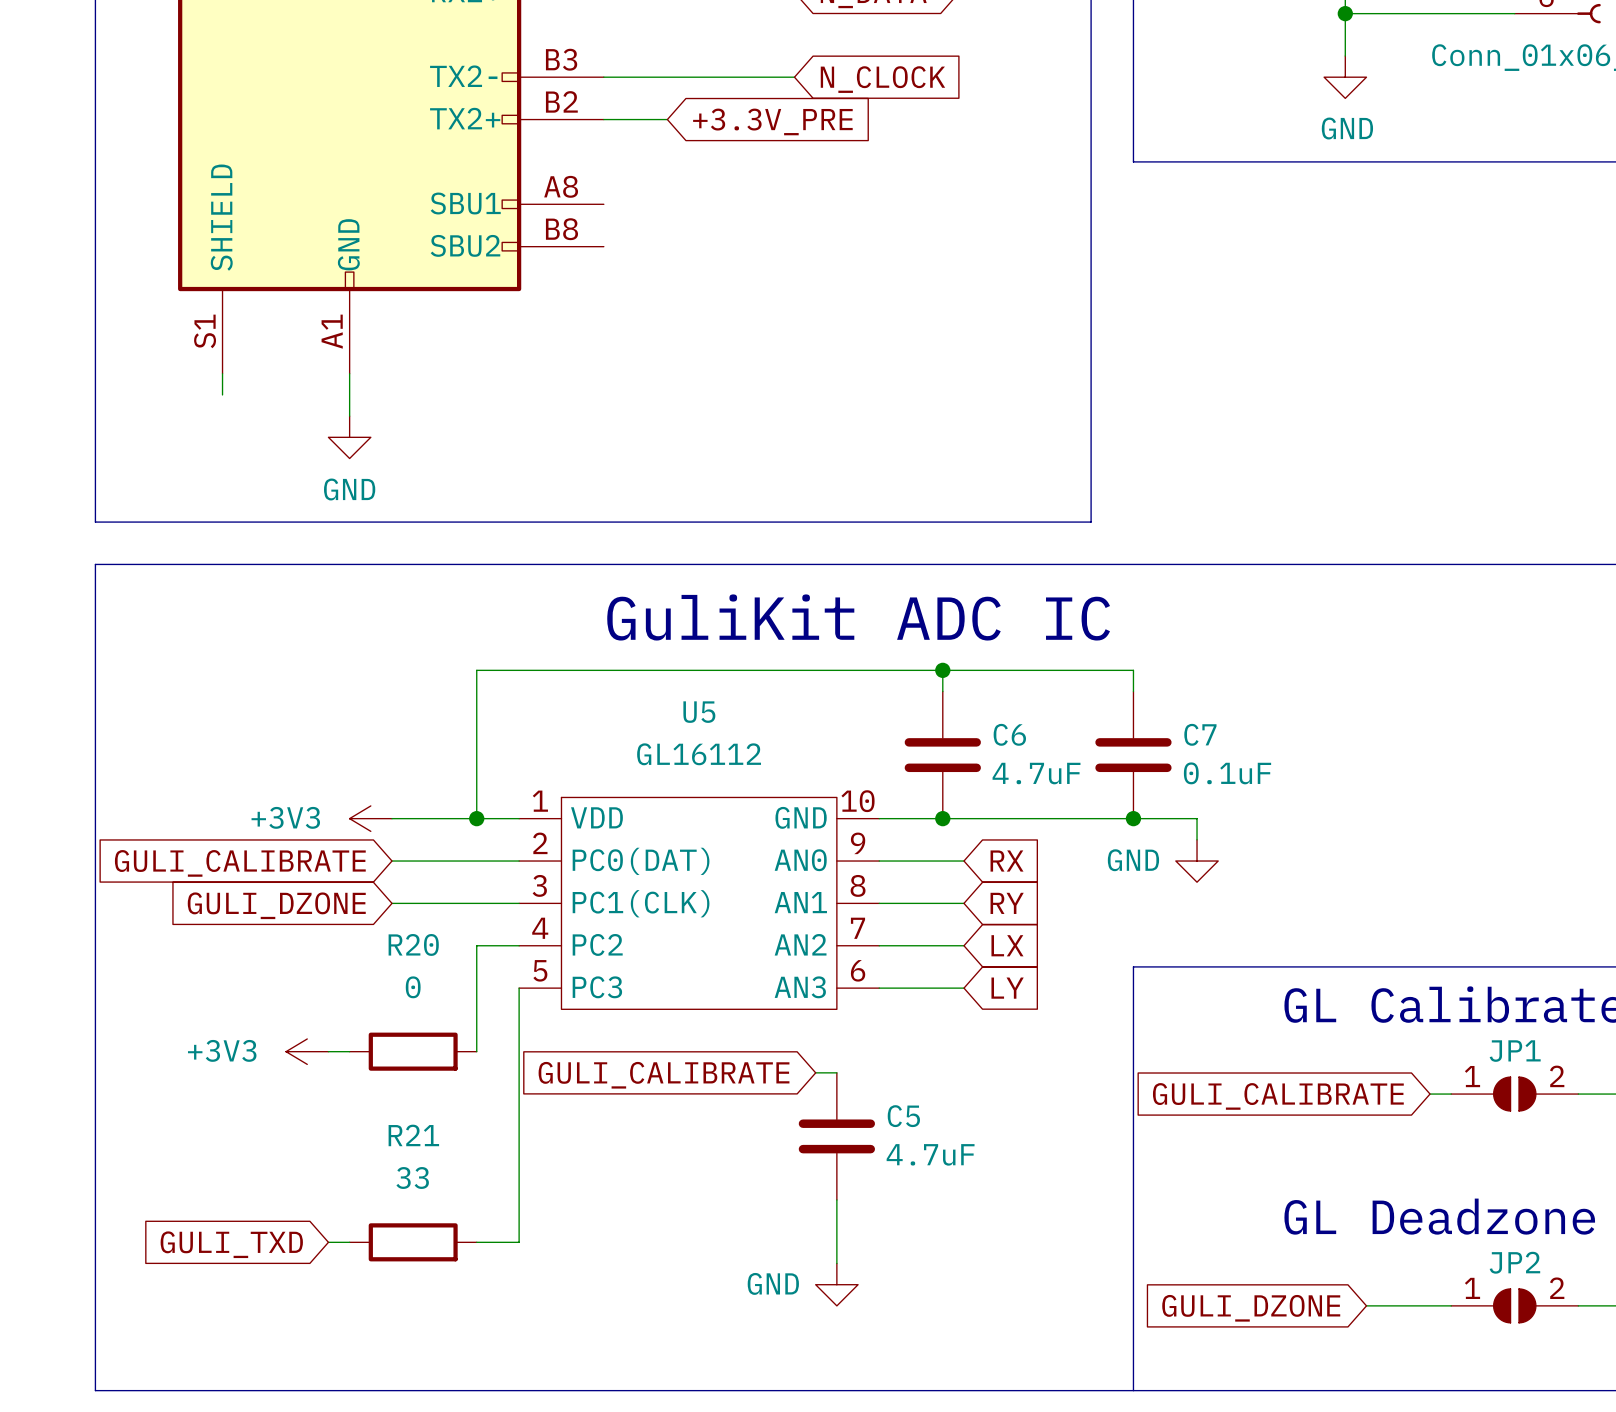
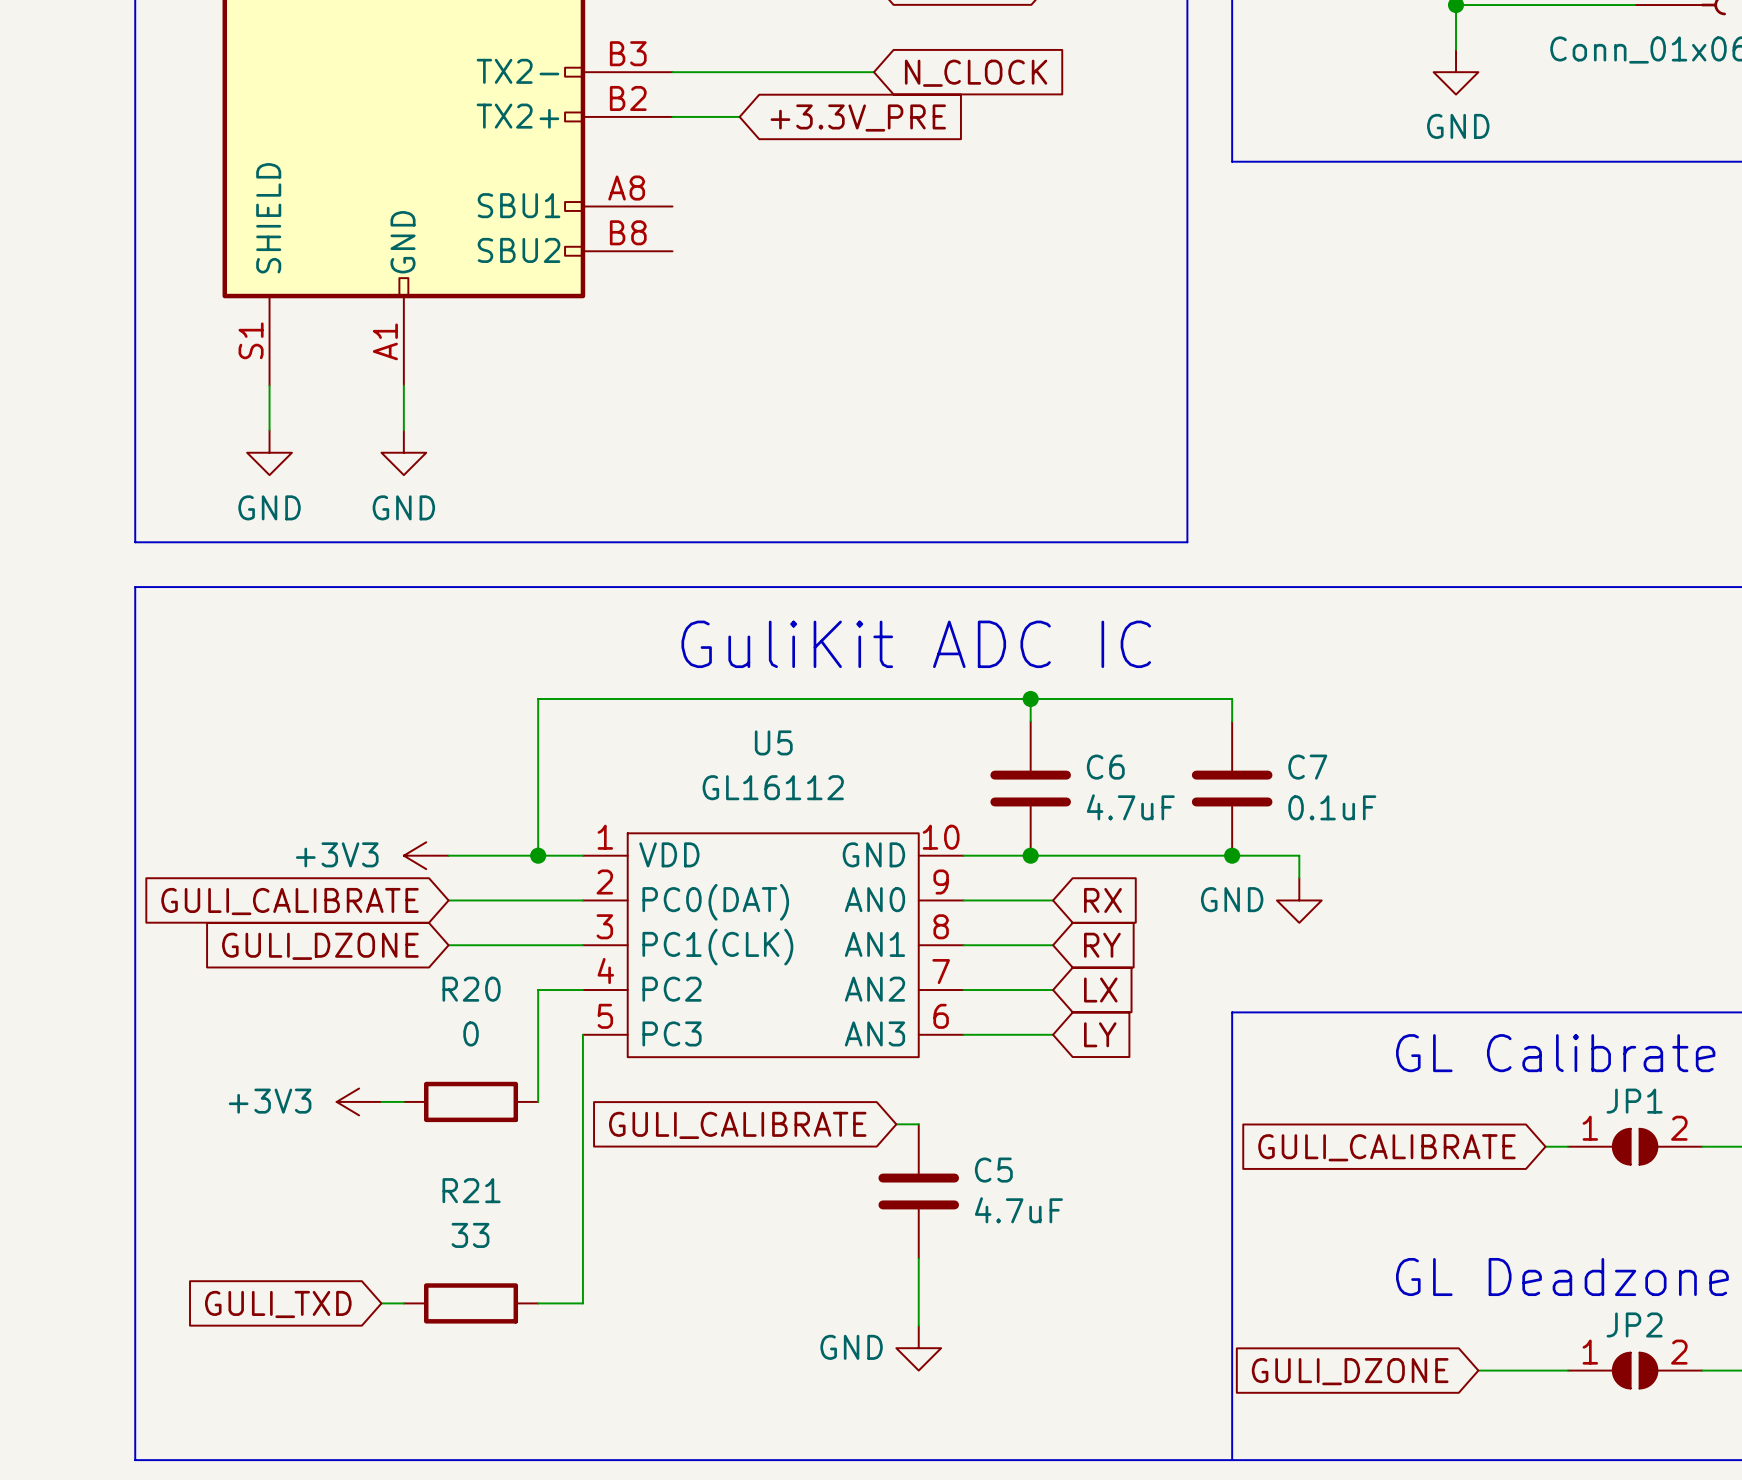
wire: none -> (269, 407) (269, 430)
power symbol: none -> GND (269, 452)

